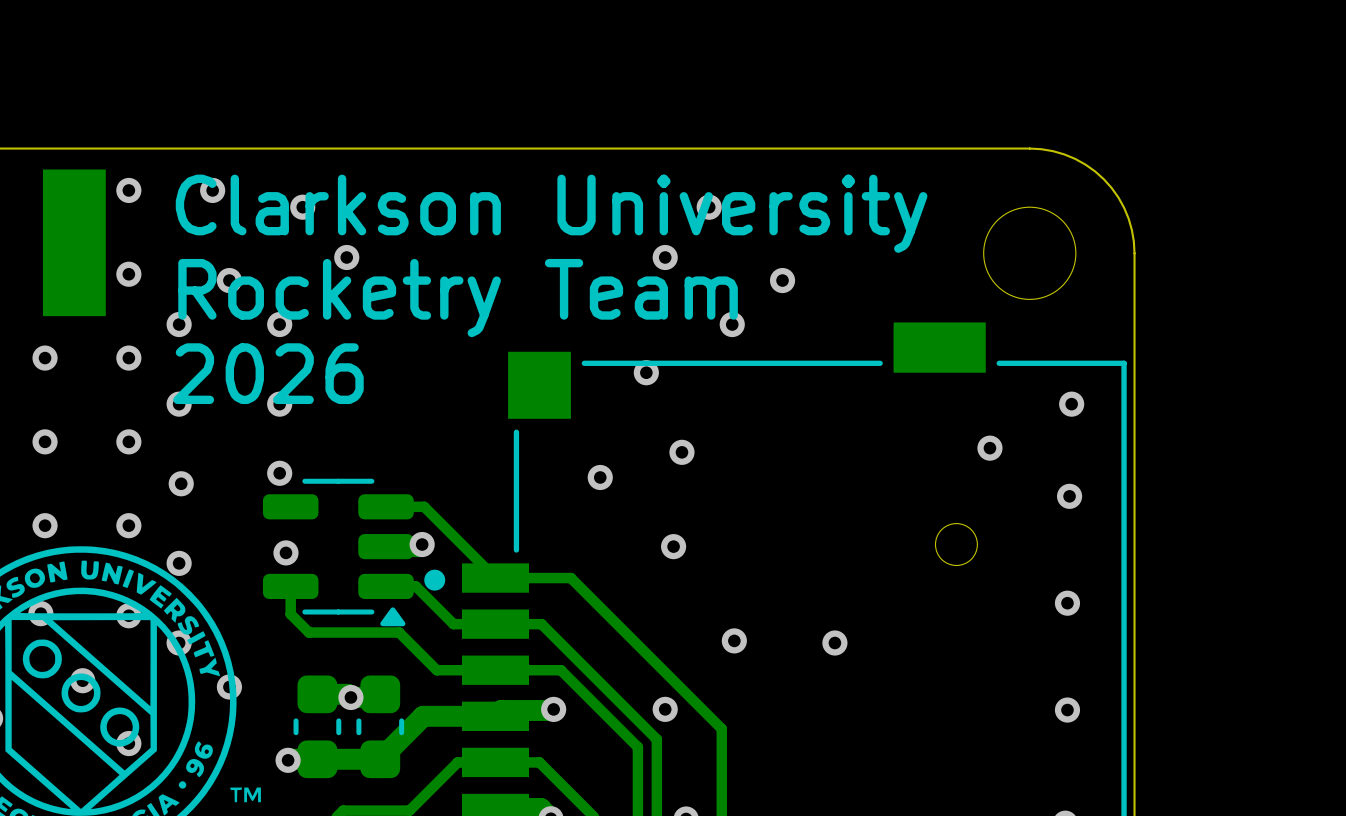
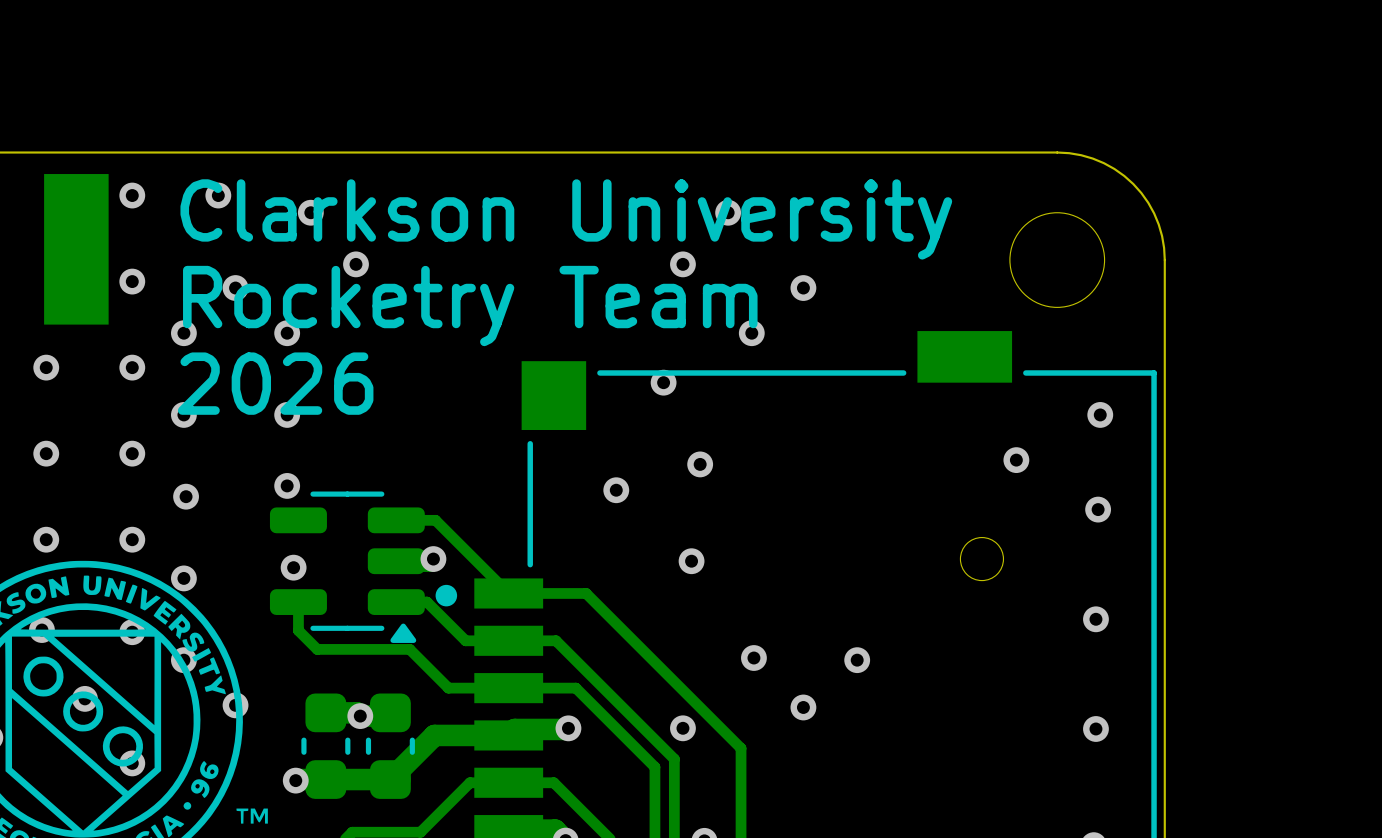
via: none -> (803, 707)

